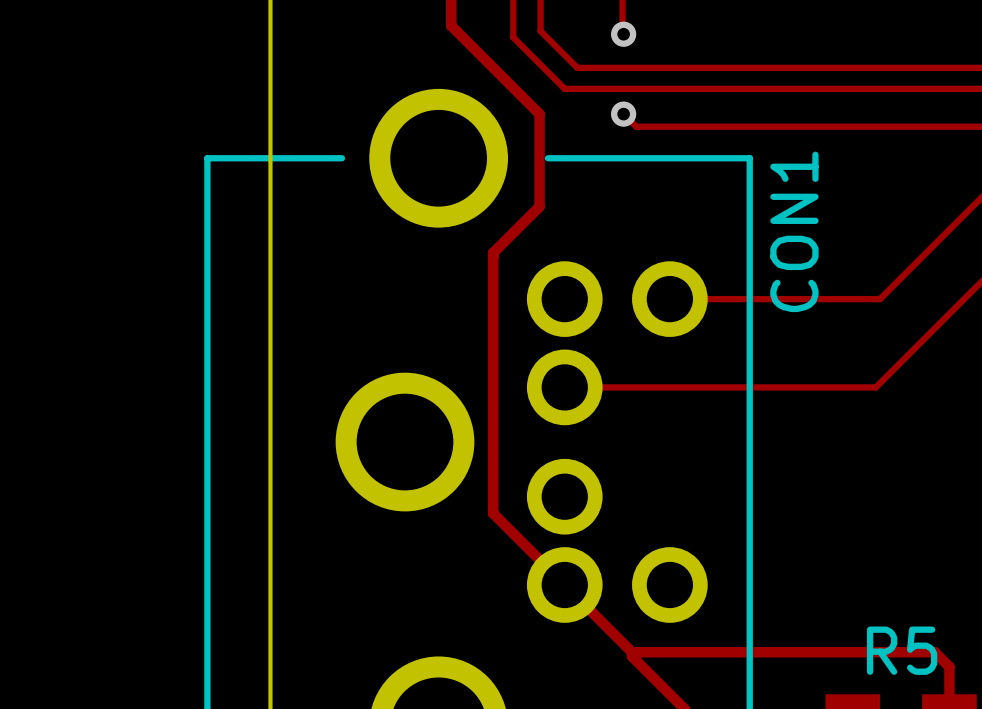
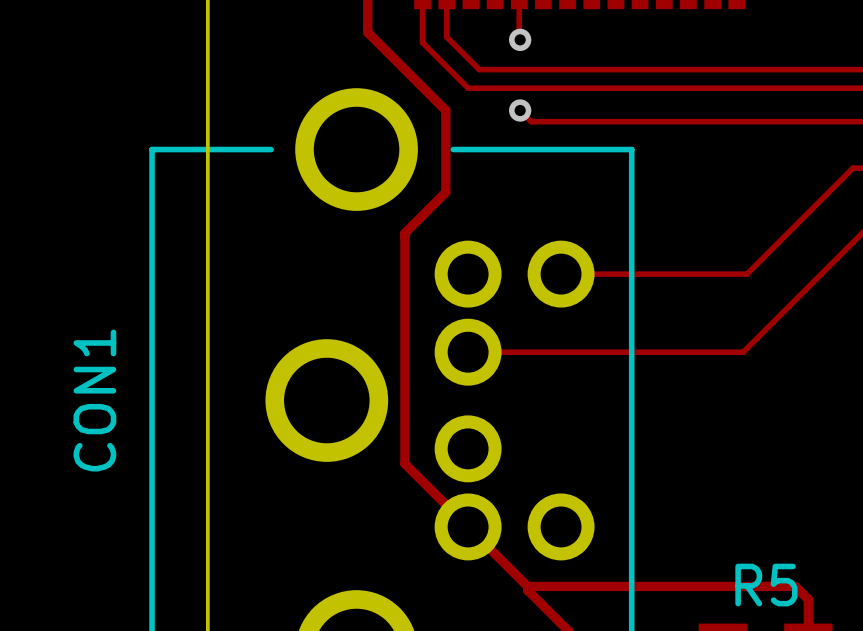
CON1 name position: CON1 (794, 231) -> CON1 (94, 400)

